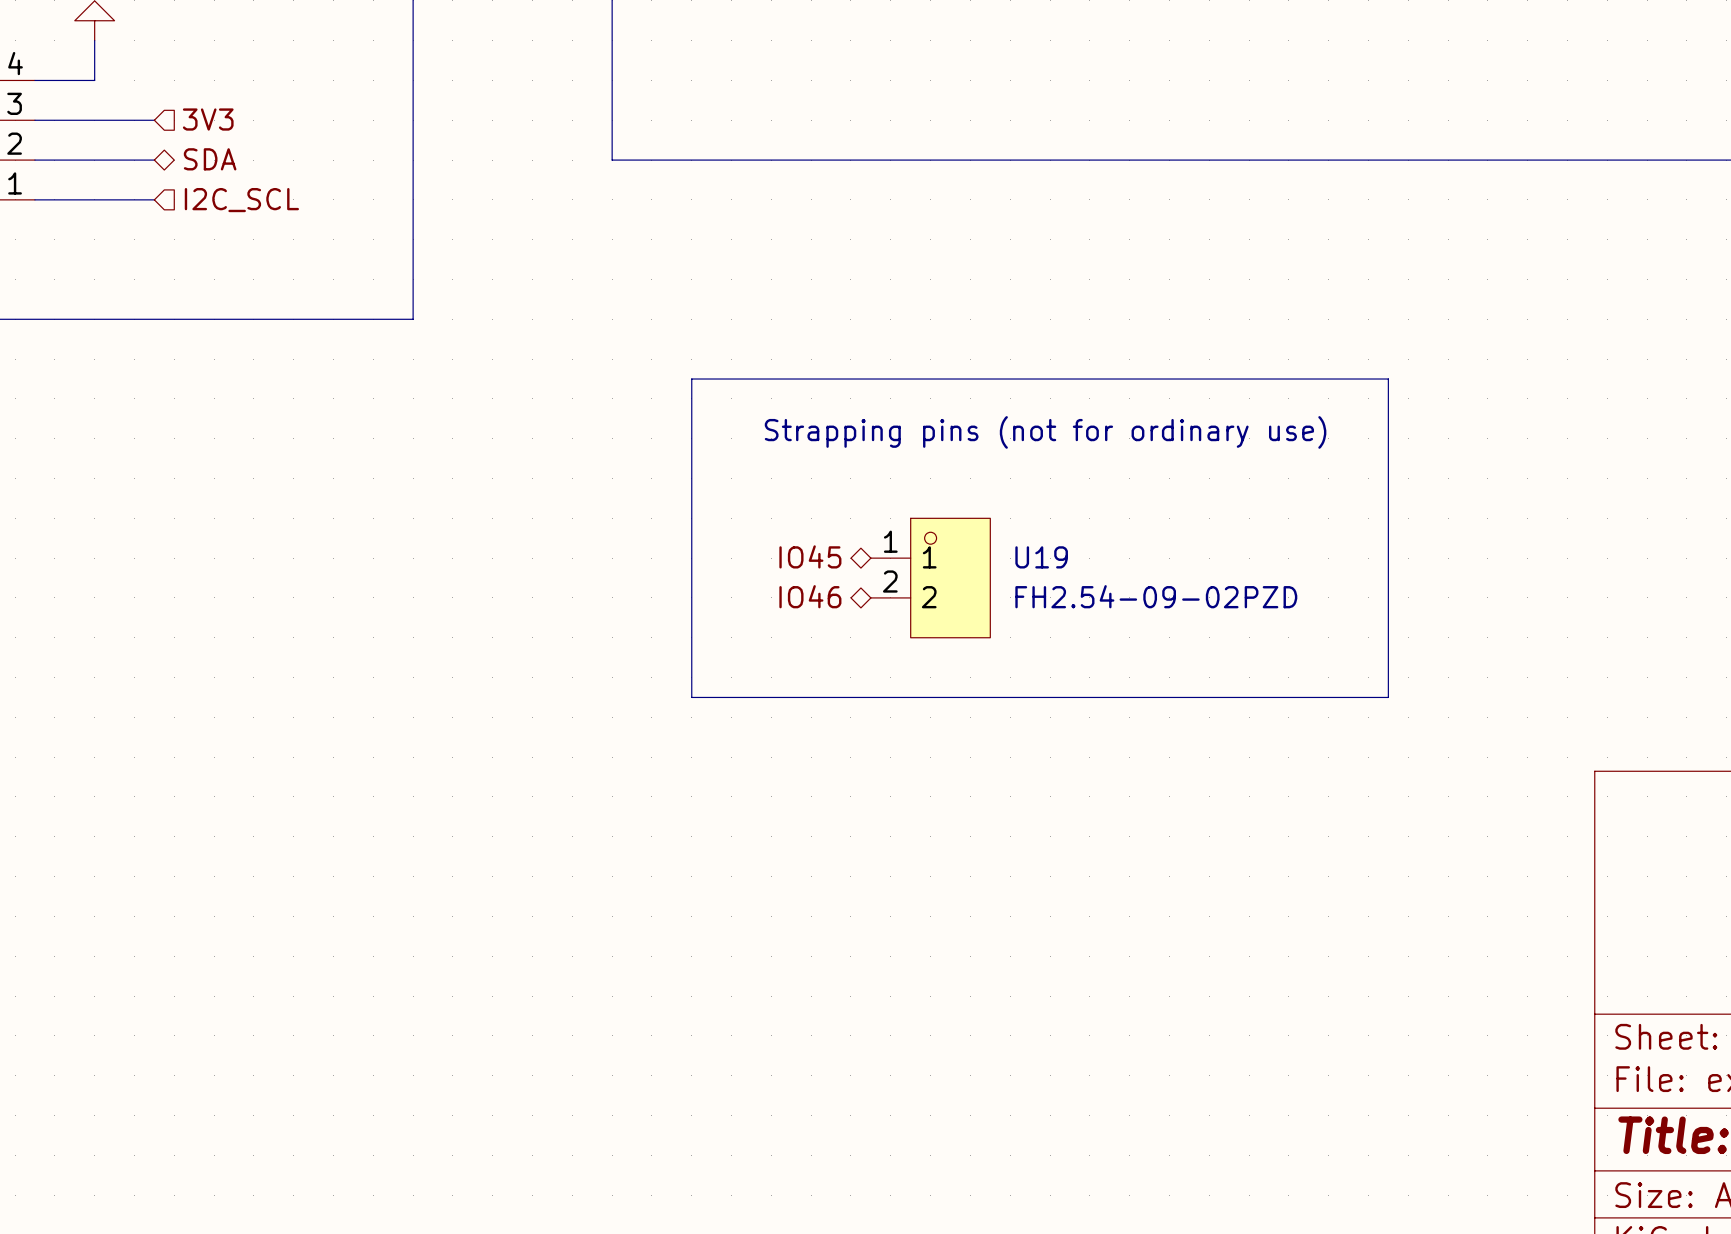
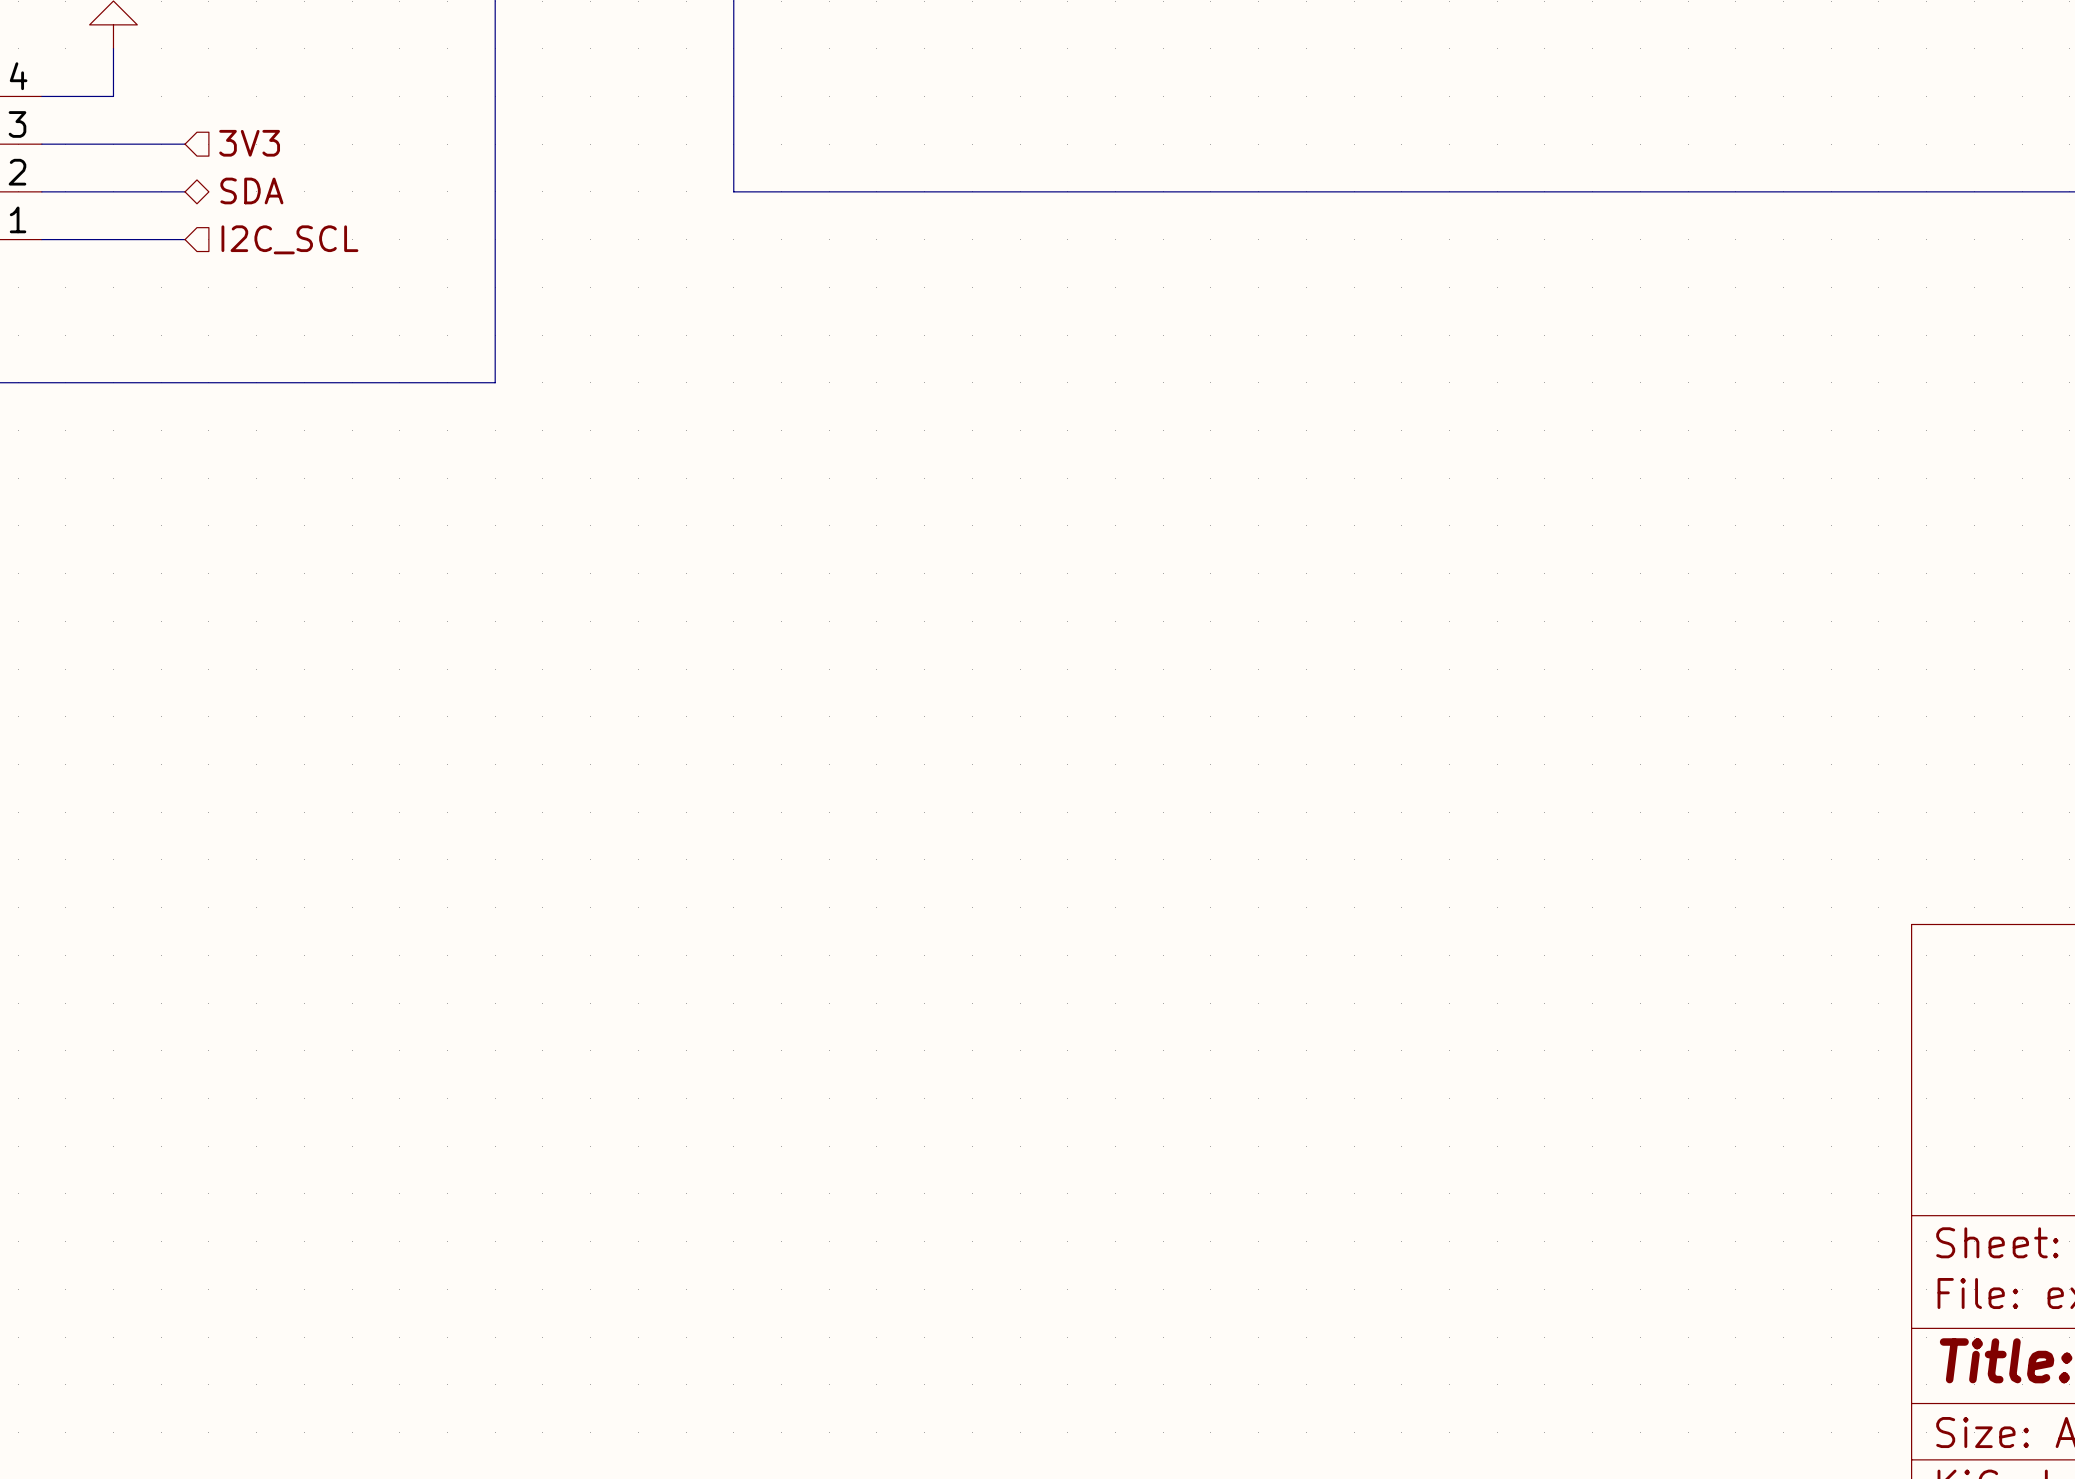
line: (691, 379) (1388, 379) (1388, 697) (691, 697) (691, 379) -> none
text: Strapping pins (not for ordinary use) (1045, 432) -> none
hierarchical label: IO45 (810, 556) -> none
U19: FH2.54-09-02PZD (930, 578) -> none
hierarchical label: IO46 (810, 596) -> none

